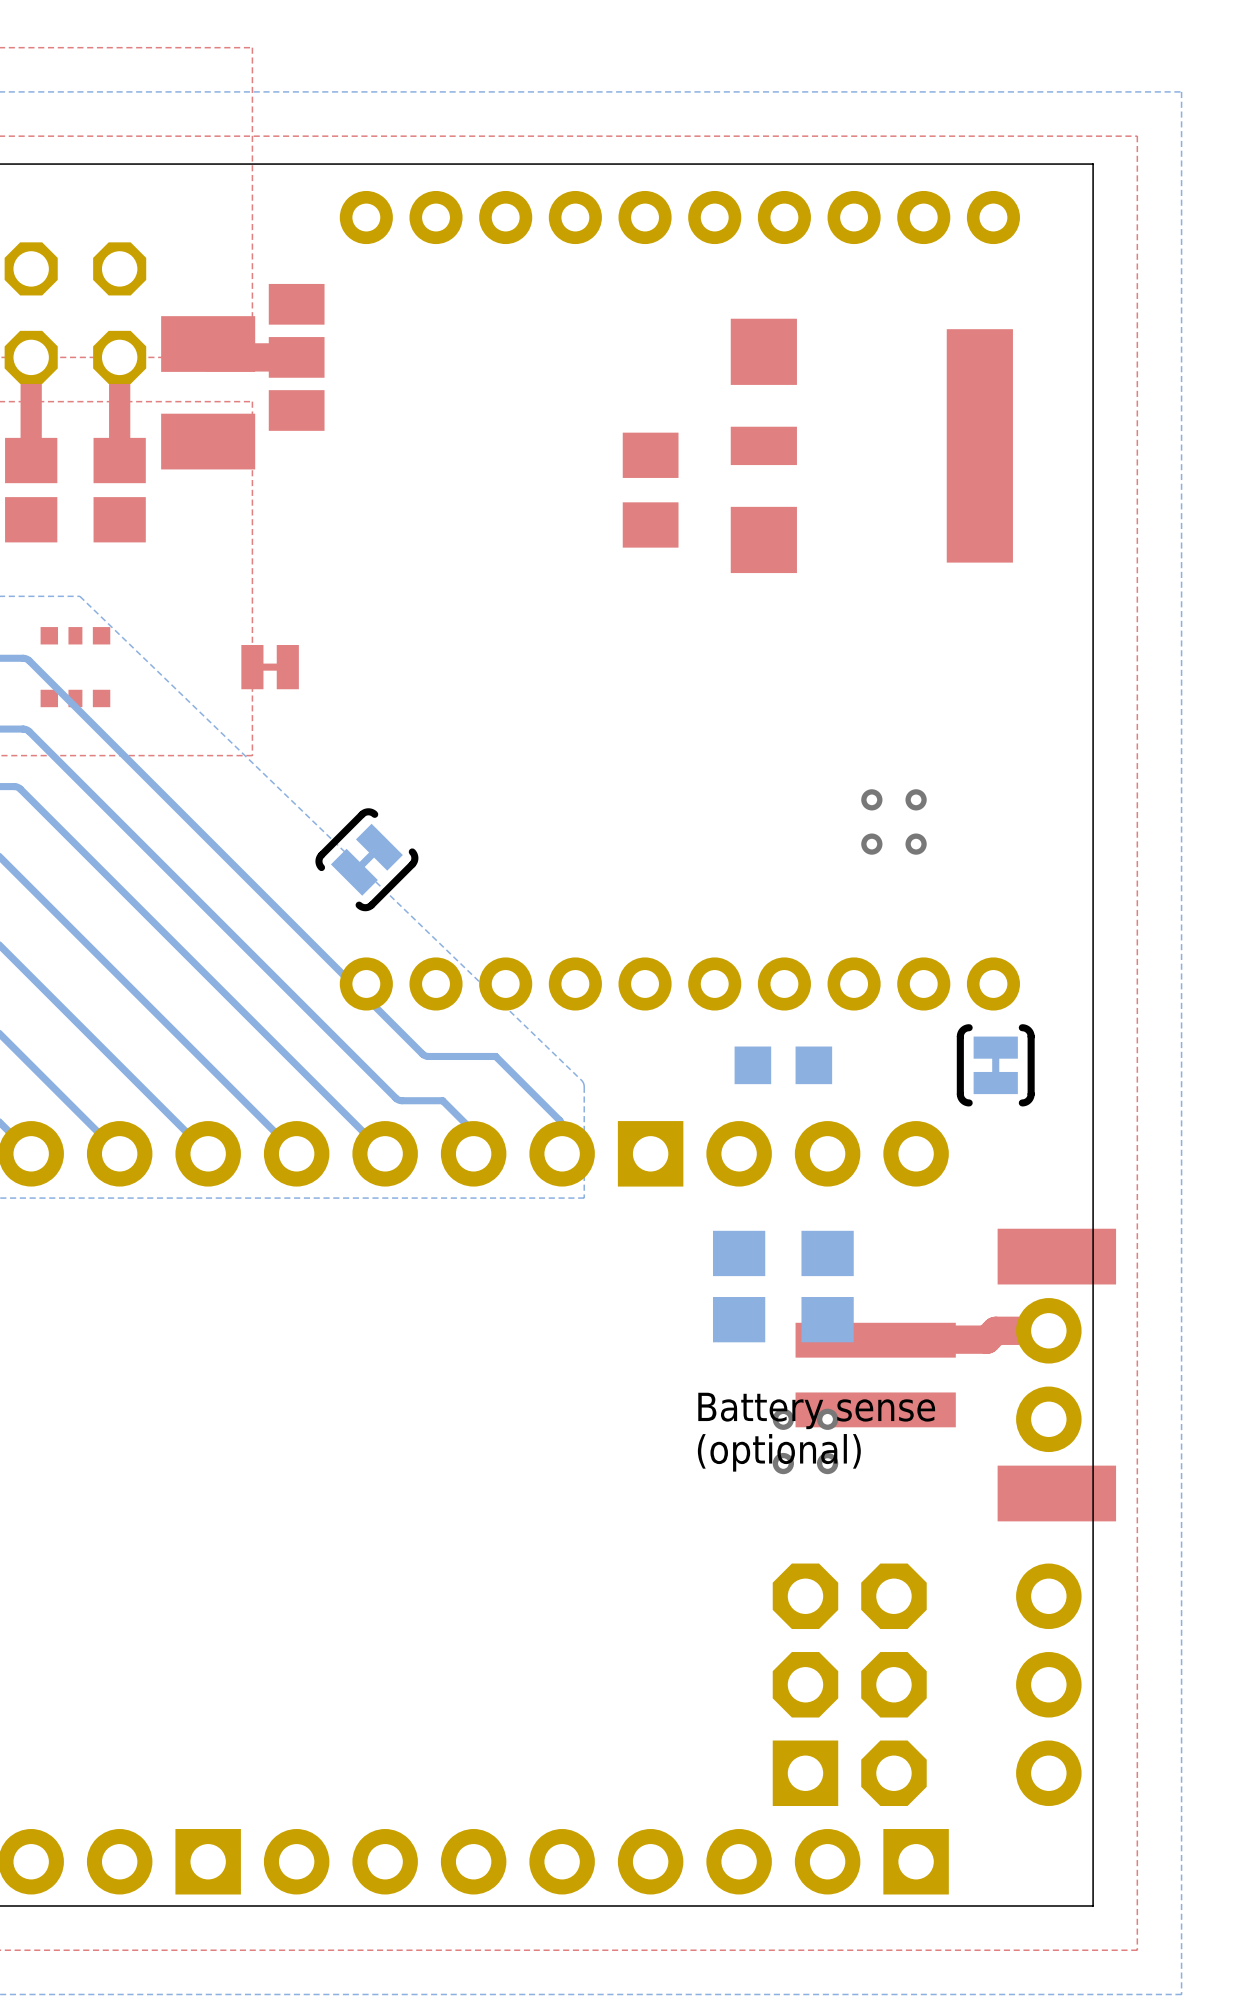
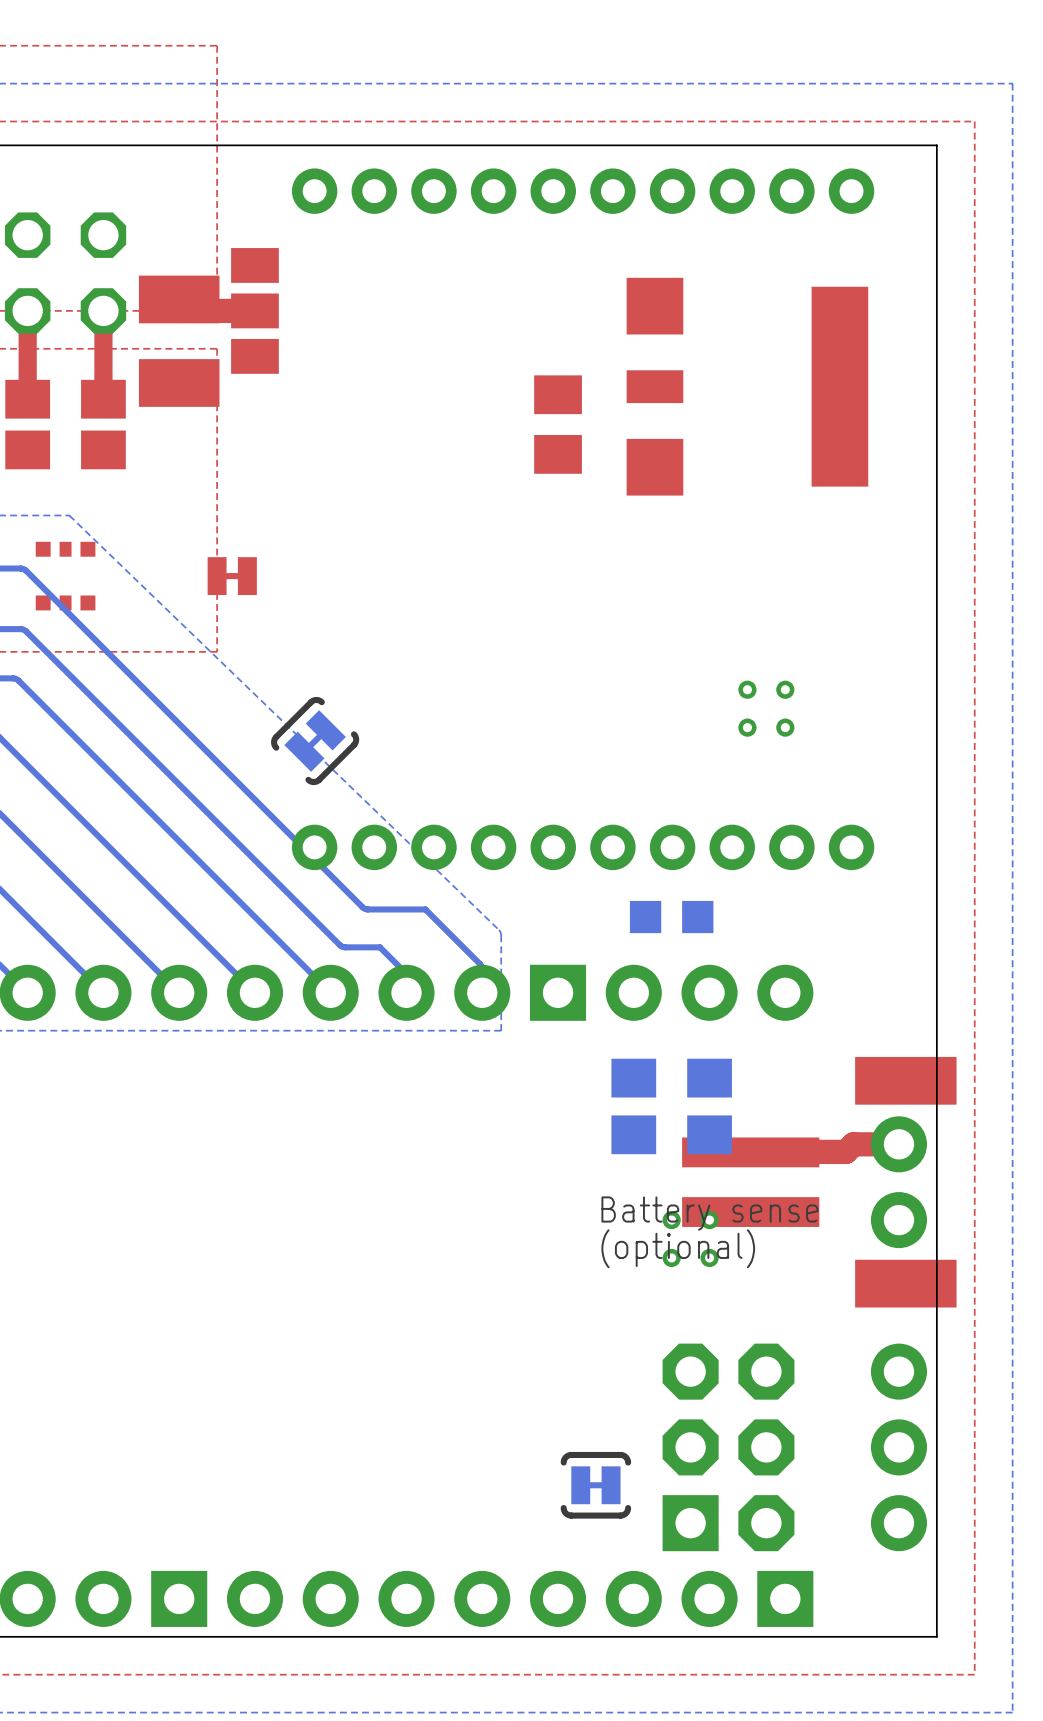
part rotation: 0° (995, 1065) -> 90° clockwise (595, 1485)
part position: (995, 1065) -> (595, 1485)

